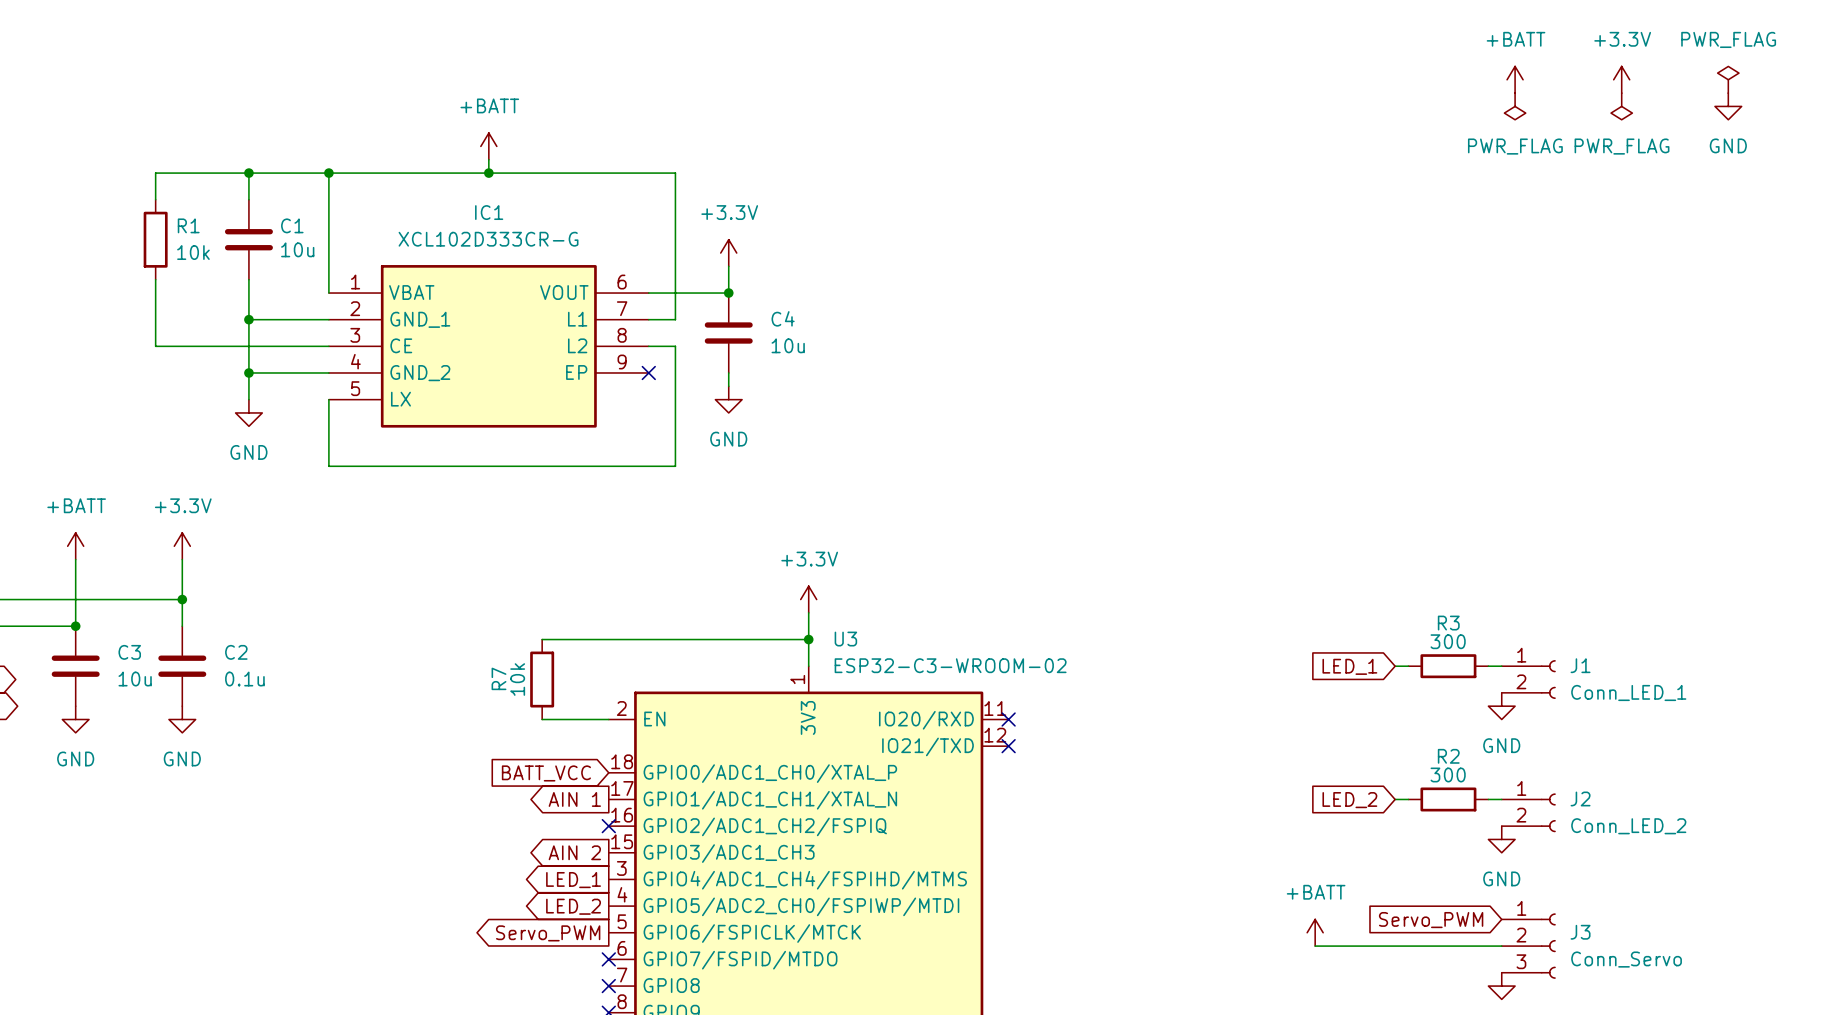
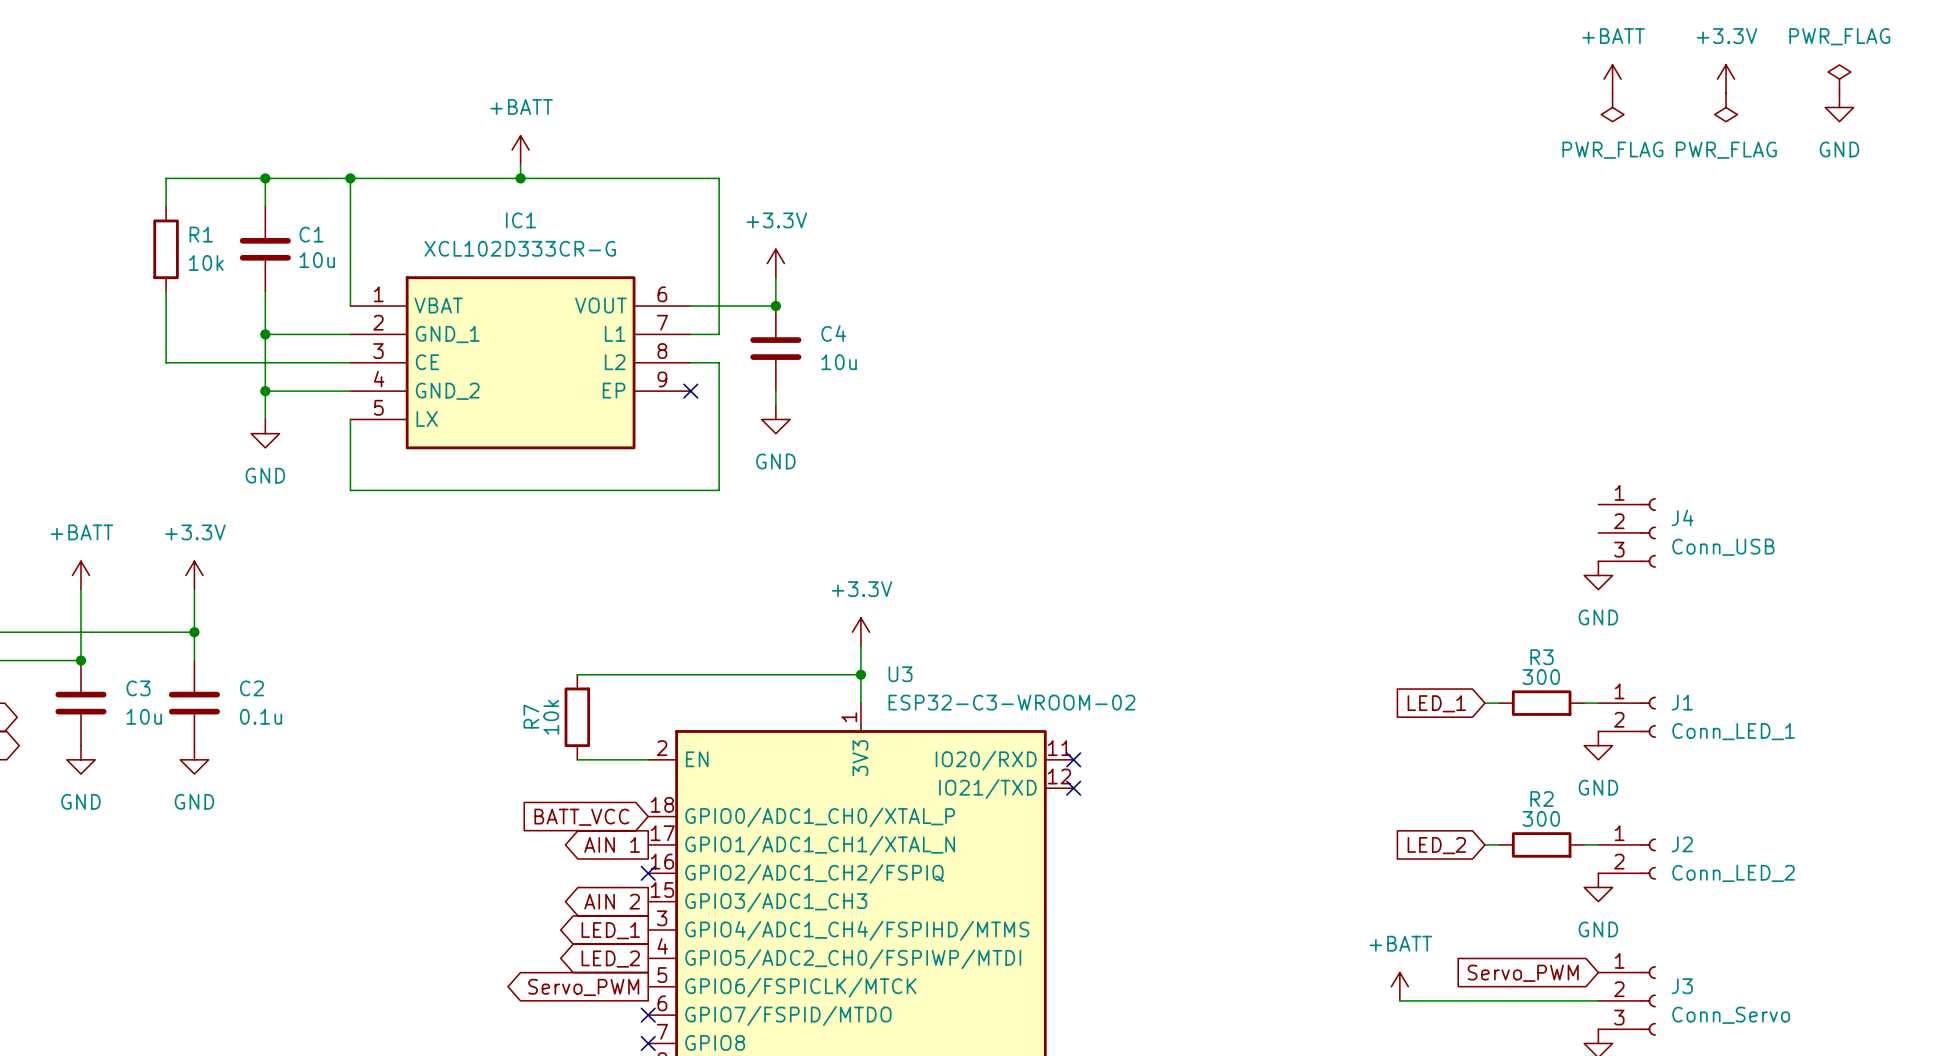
J4: none -> Conn_USB (1627, 532)
power symbol: none -> GND (1598, 575)

